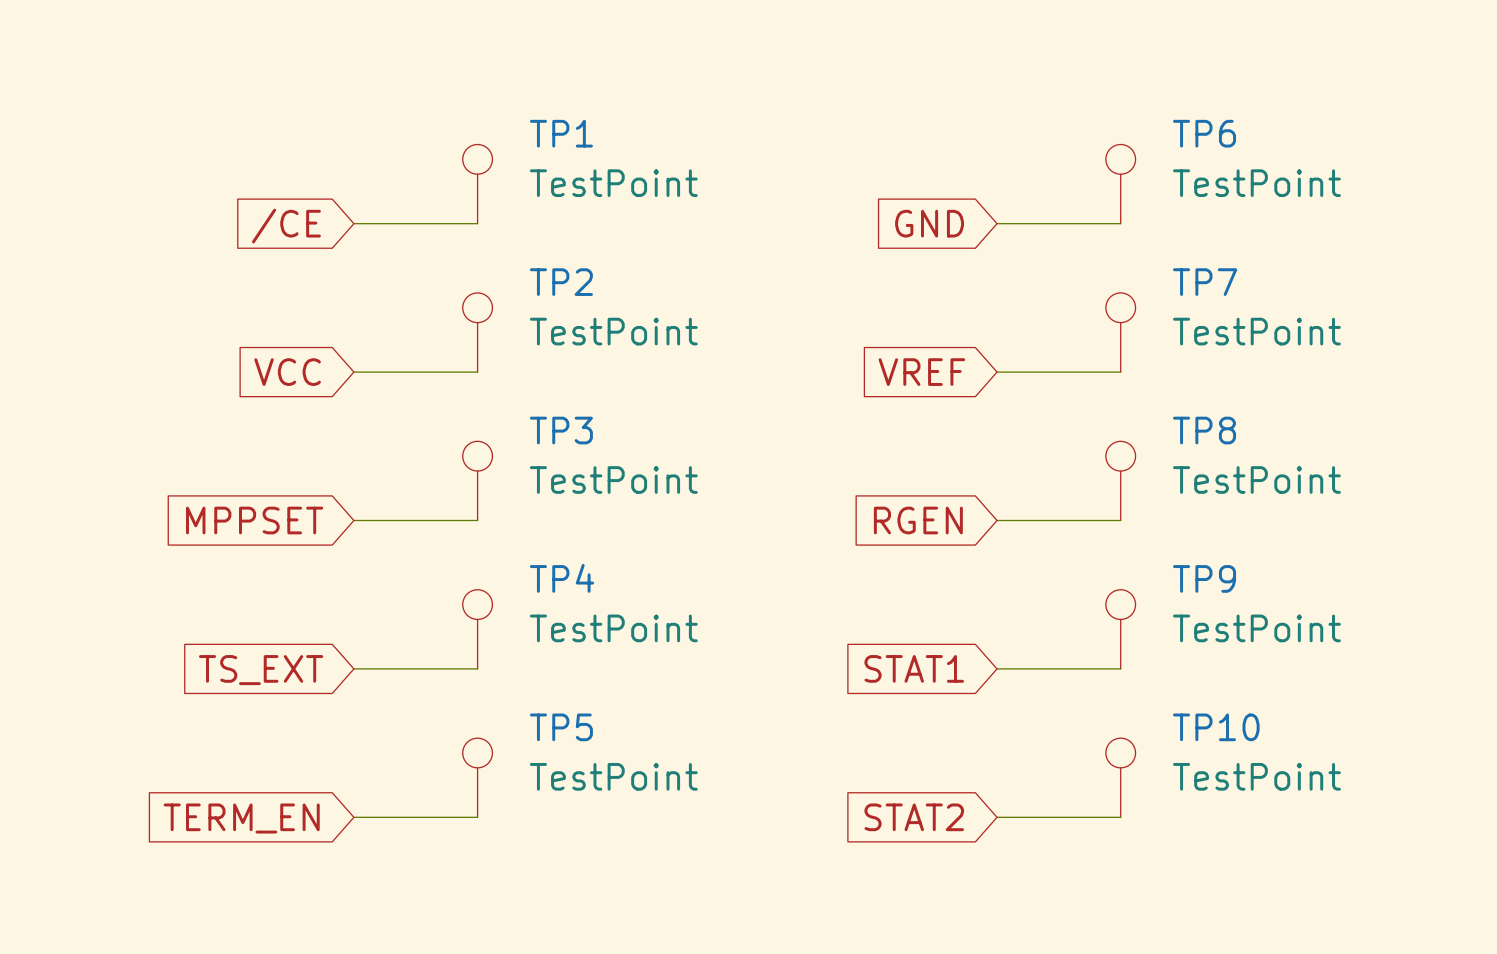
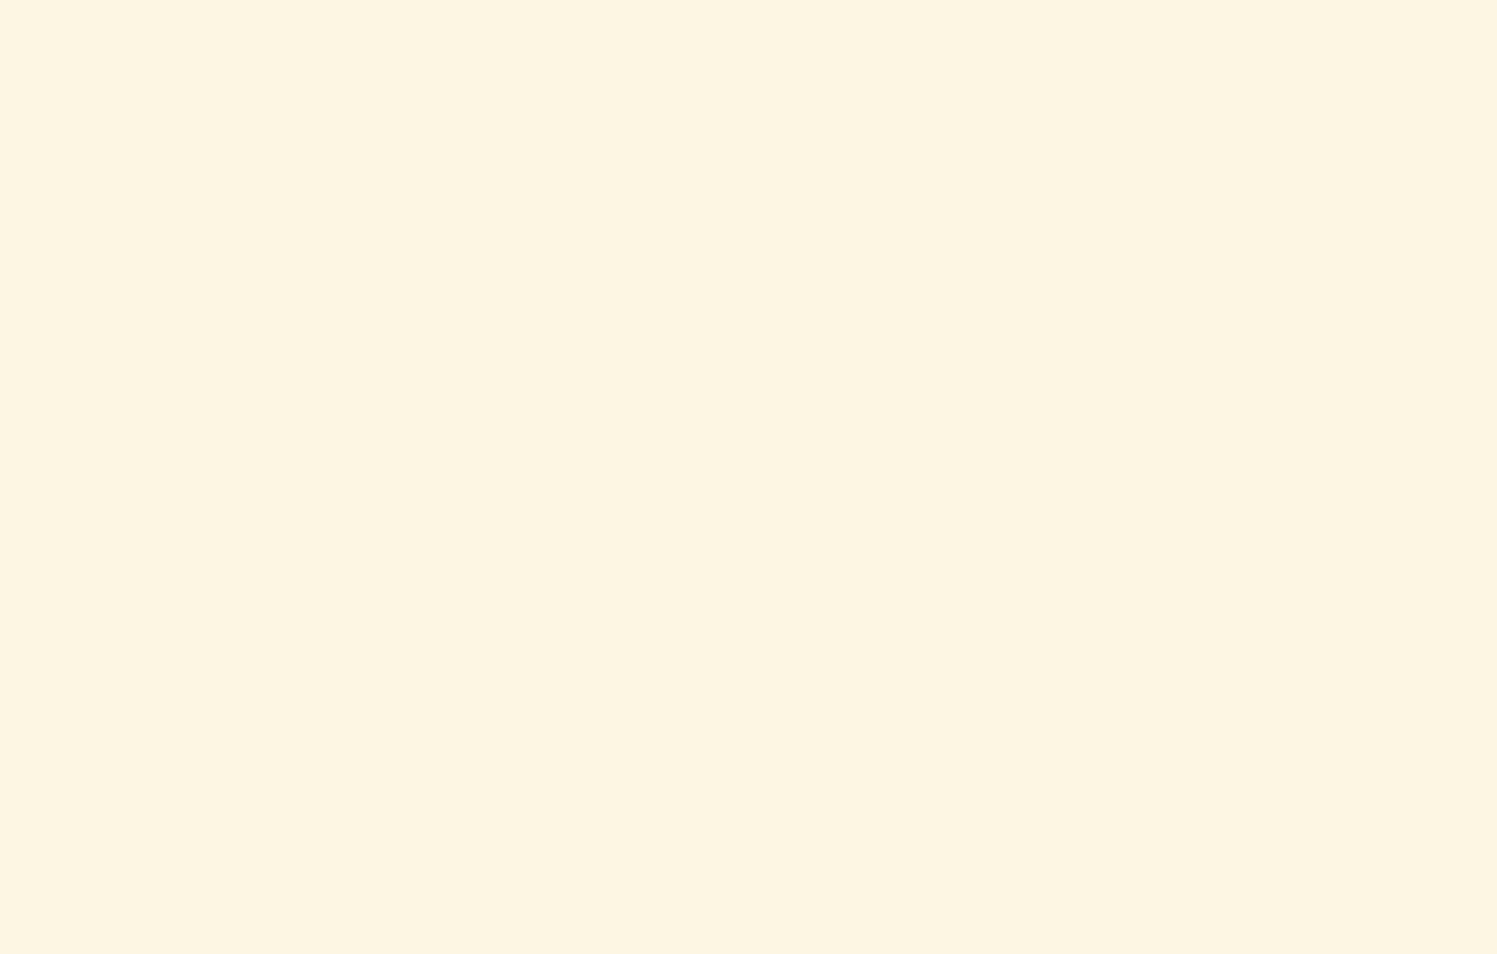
TP1: TestPoint (477, 184) -> none
TP6: TestPoint (1120, 184) -> none
wire: (353, 223) (477, 223) -> none
global label: GND (929, 223) -> none
wire: (997, 223) (1120, 223) -> none
global label: /CE (286, 226) -> none
TP2: TestPoint (477, 332) -> none
TP7: TestPoint (1120, 332) -> none
global label: VCC (287, 372) -> none
wire: (353, 372) (477, 372) -> none
global label: VREF (921, 372) -> none
wire: (997, 372) (1120, 372) -> none
TP3: TestPoint (477, 480) -> none
TP8: TestPoint (1120, 480) -> none
global label: MPPSET (254, 520) -> none
wire: (353, 520) (477, 520) -> none
global label: RGEN (918, 520) -> none
wire: (997, 520) (1120, 520) -> none
TP4: TestPoint (477, 629) -> none
TP9: TestPoint (1120, 629) -> none
wire: (353, 668) (477, 668) -> none
global label: STAT1 (914, 668) -> none
wire: (997, 668) (1120, 668) -> none
global label: TS_EXT (261, 670) -> none
TP5: TestPoint (477, 777) -> none
TP10: TestPoint (1120, 777) -> none
wire: (353, 817) (477, 817) -> none
global label: STAT2 (914, 817) -> none
wire: (997, 817) (1120, 817) -> none
global label: TERM_EN (241, 818) -> none

